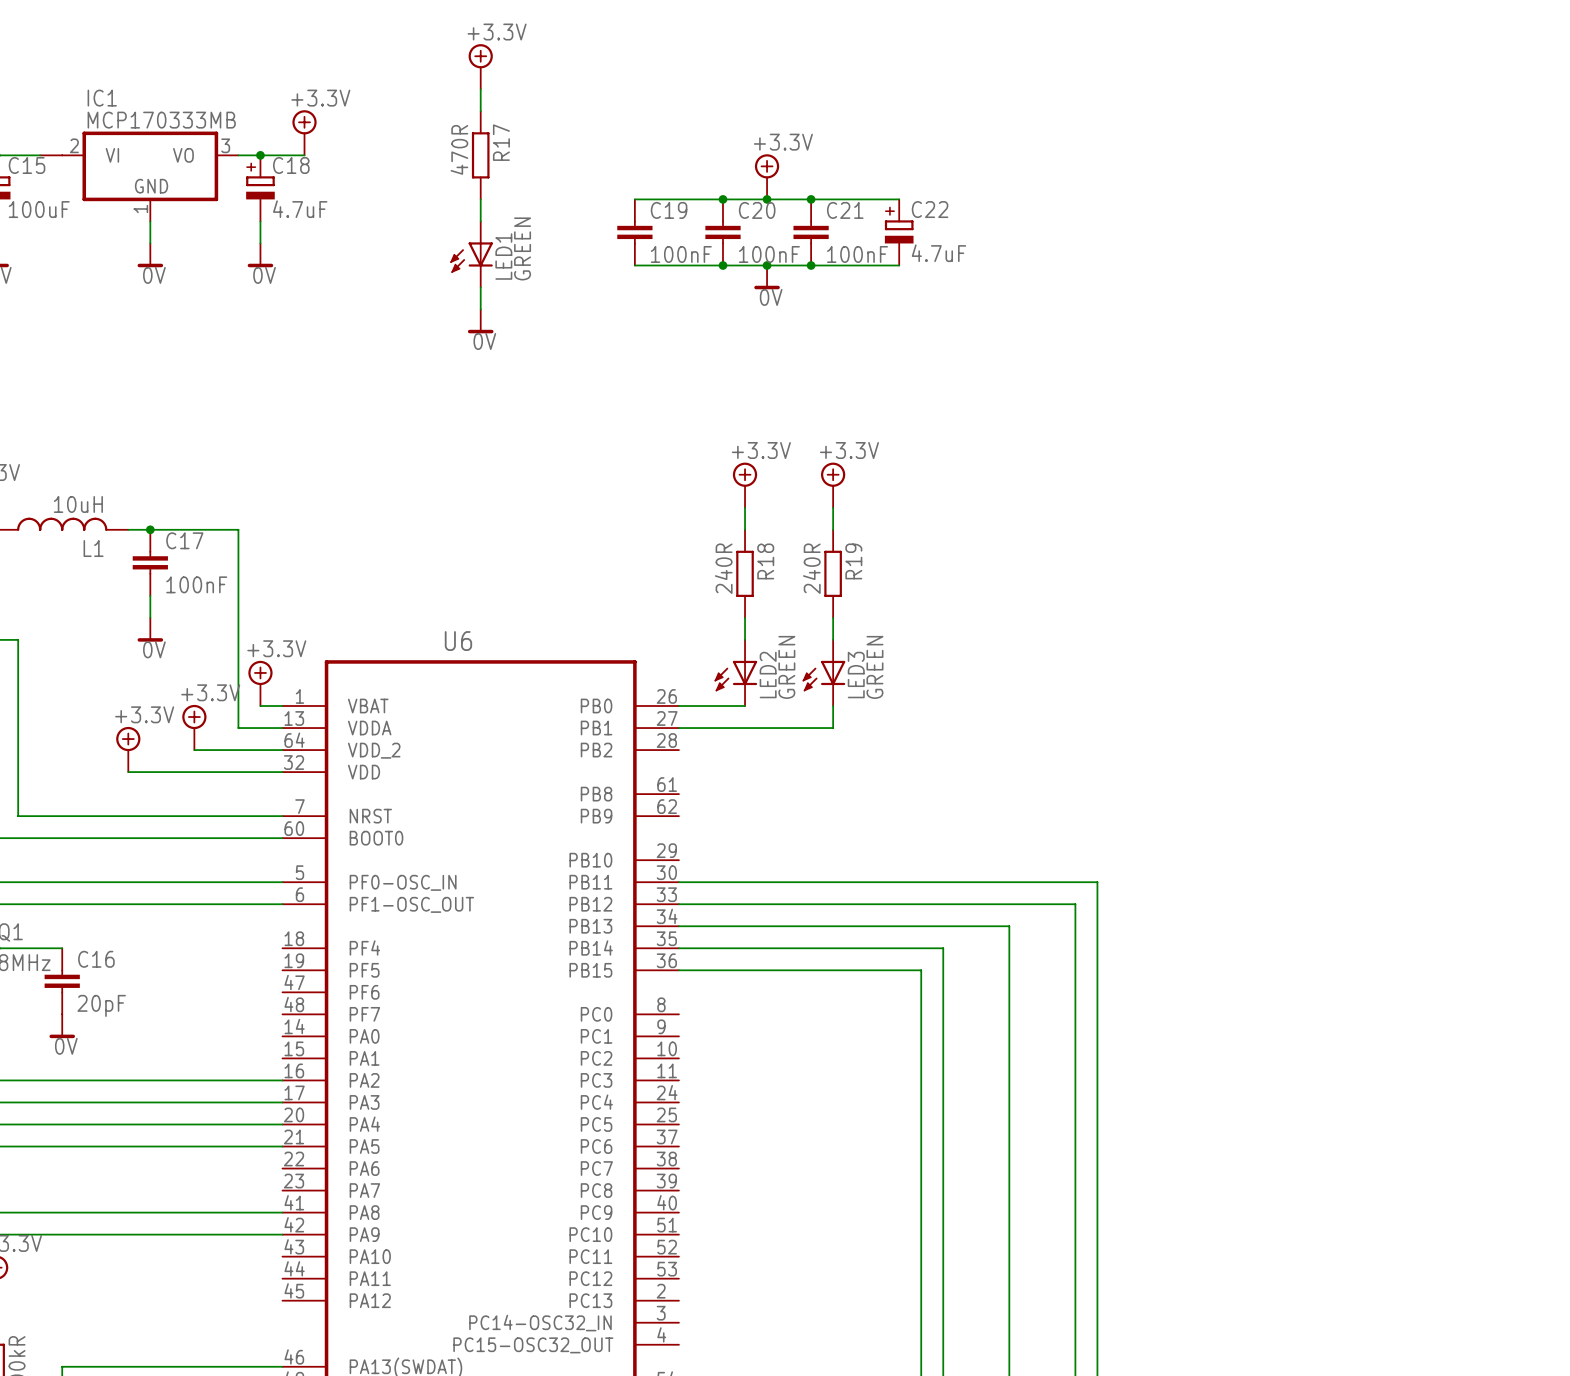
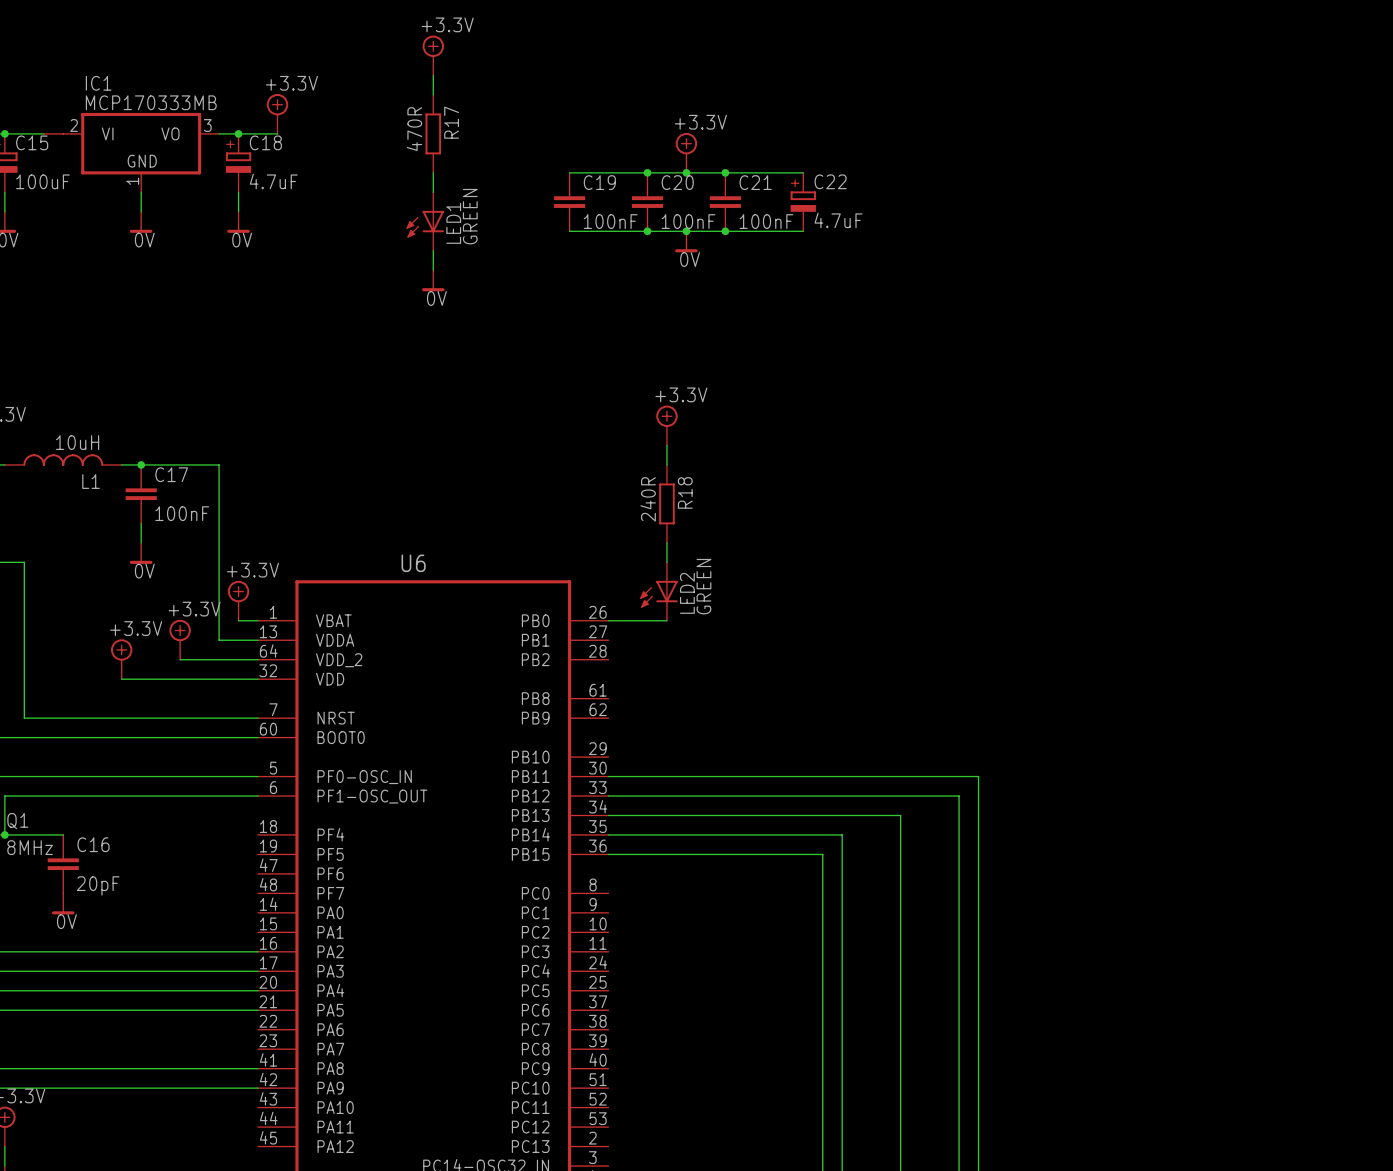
power symbol: +3.3V (833, 485) -> none
wire: (833, 507) (833, 529) -> none
R19: 240R (833, 573) -> none
wire: (833, 617) (833, 639) -> none
LED3: GREEN (823, 672) -> none
wire: (833, 706) (833, 728) (678, 728) -> none

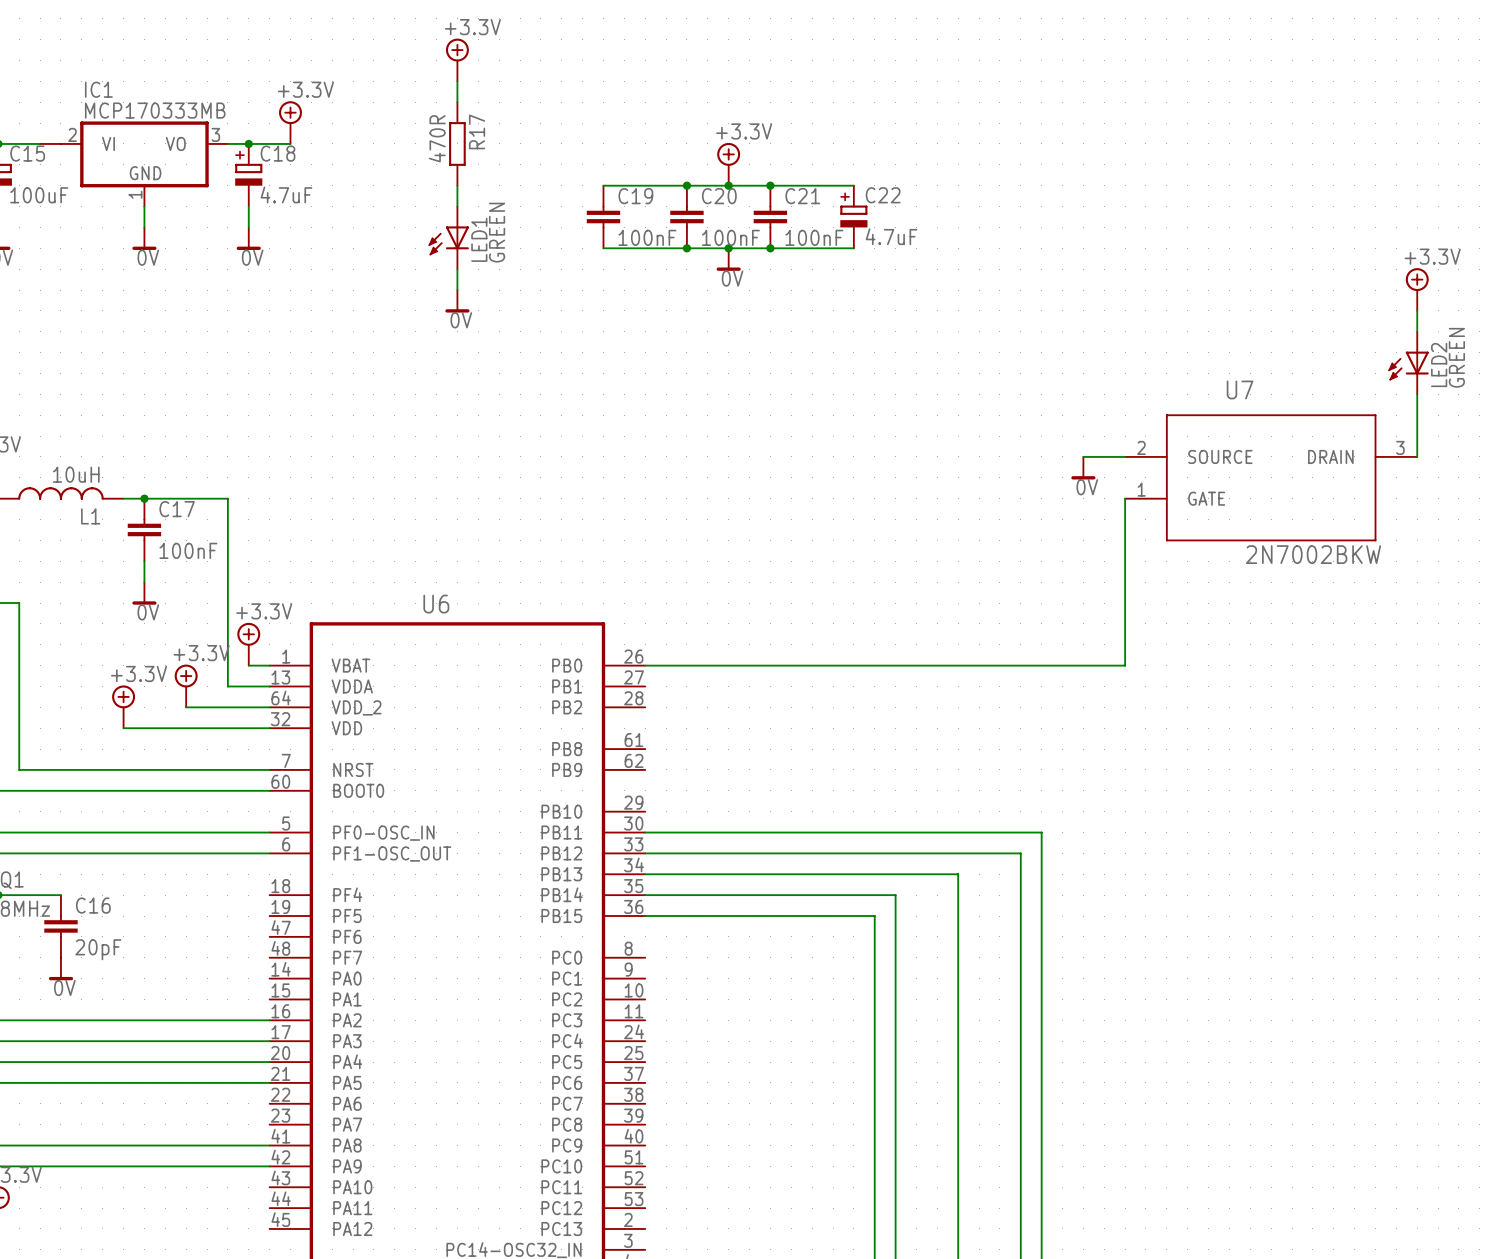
power symbol: none -> +3.3V (1417, 289)
wire: none -> (1417, 310) (1417, 331)
wire: none -> (1417, 394) (1417, 456)
power symbol: +3.3V (666, 425) -> none
wire: none -> (1083, 456) (1125, 456)
power symbol: none -> 0V (1083, 468)
wire: (666, 445) (666, 464) -> none
U7: none -> 2N7002BKW (1271, 477)
wire: none -> (1125, 498) (1125, 665) (707, 665)
R18: 240R (666, 503) -> none
wire: (666, 542) (666, 562) -> none
LED2 position: (658, 591) -> (1408, 363)

